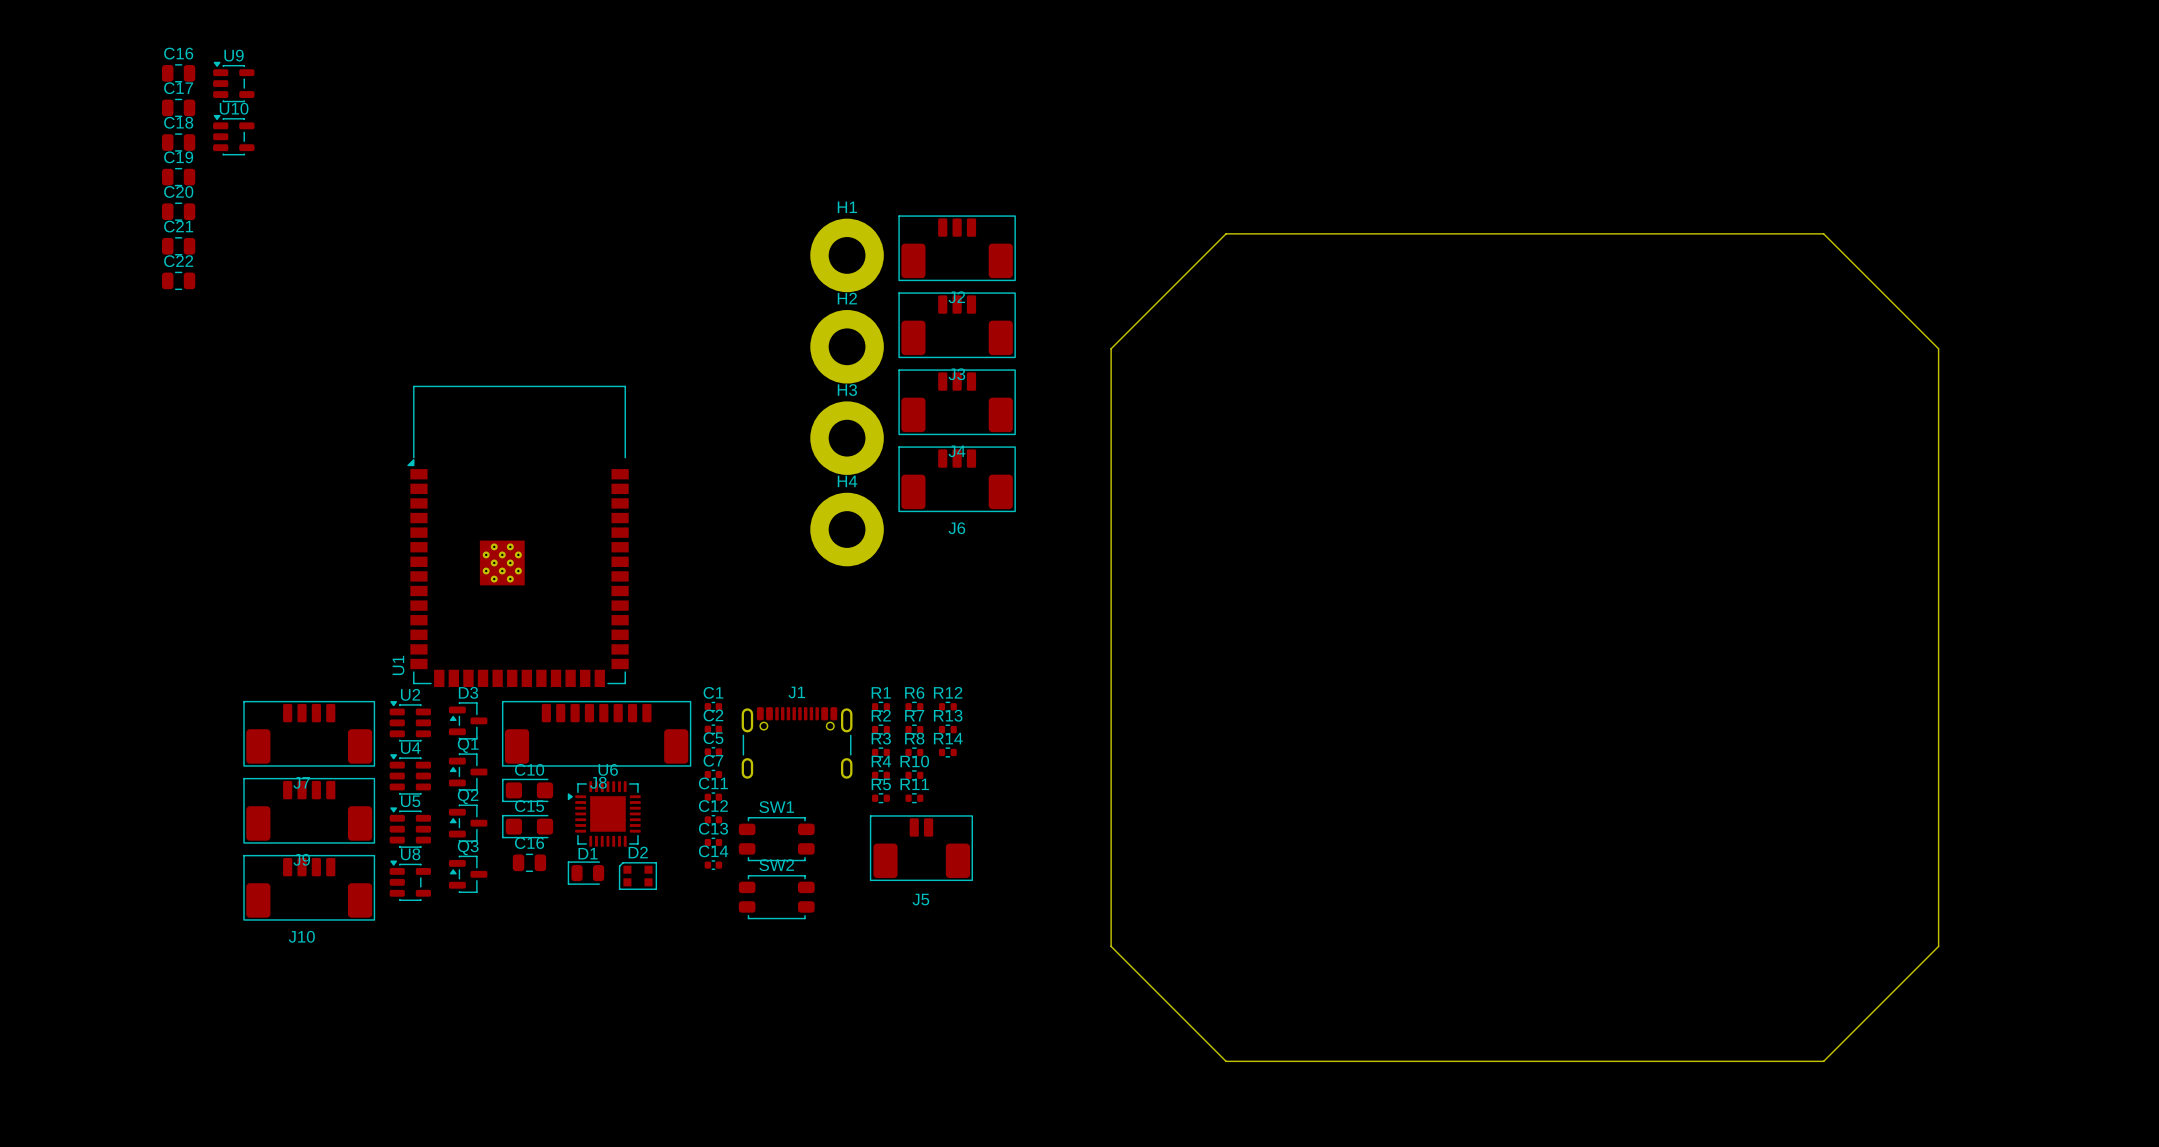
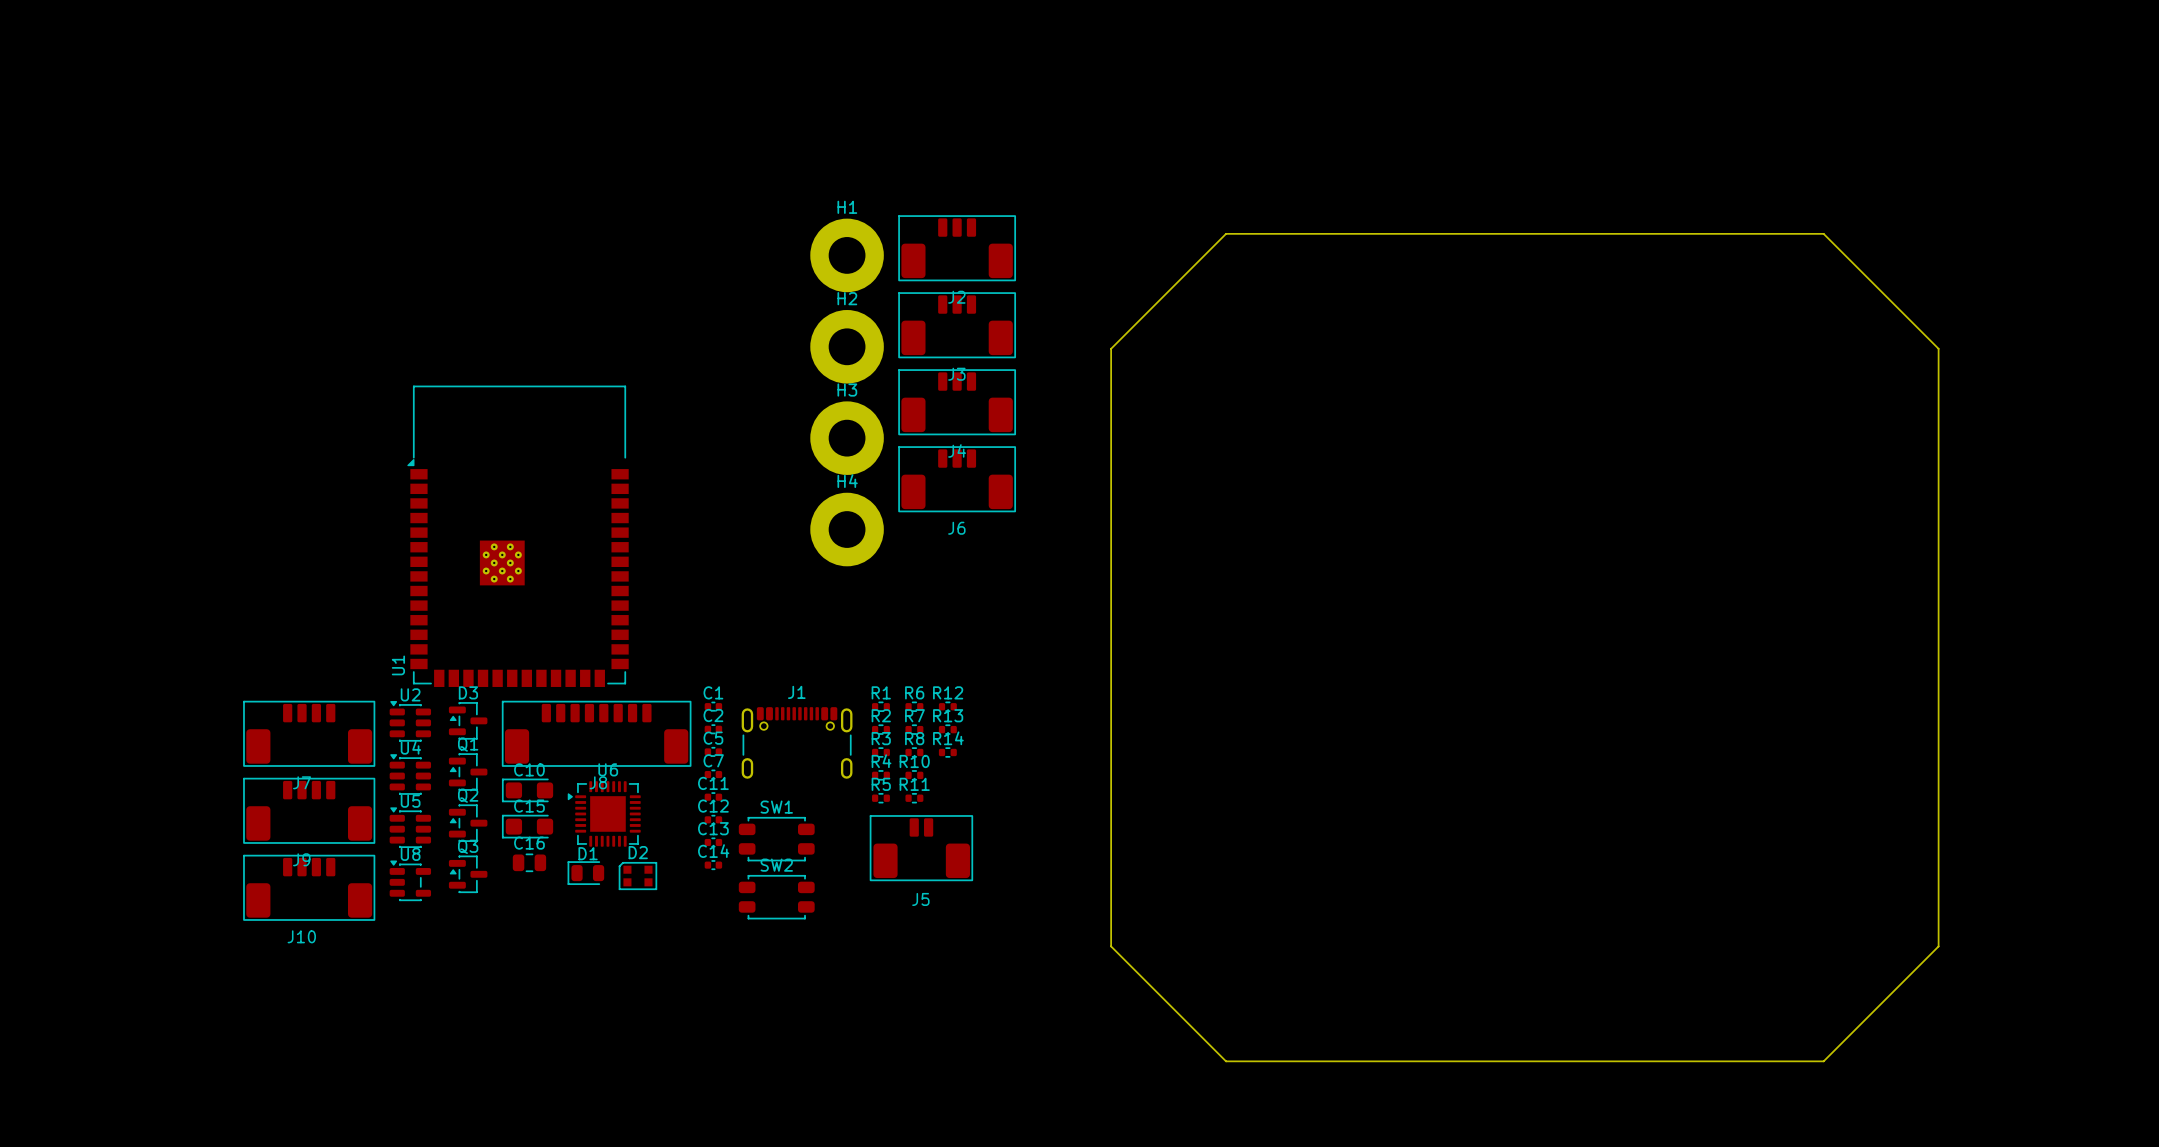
C16: (178, 73) -> none
U9: (233, 81) -> none
C17: (178, 107) -> none
U10: (233, 135) -> none
C18: (178, 142) -> none
C19: (178, 177) -> none
C20: (178, 211) -> none
C21: (178, 246) -> none
C22: (178, 280) -> none

